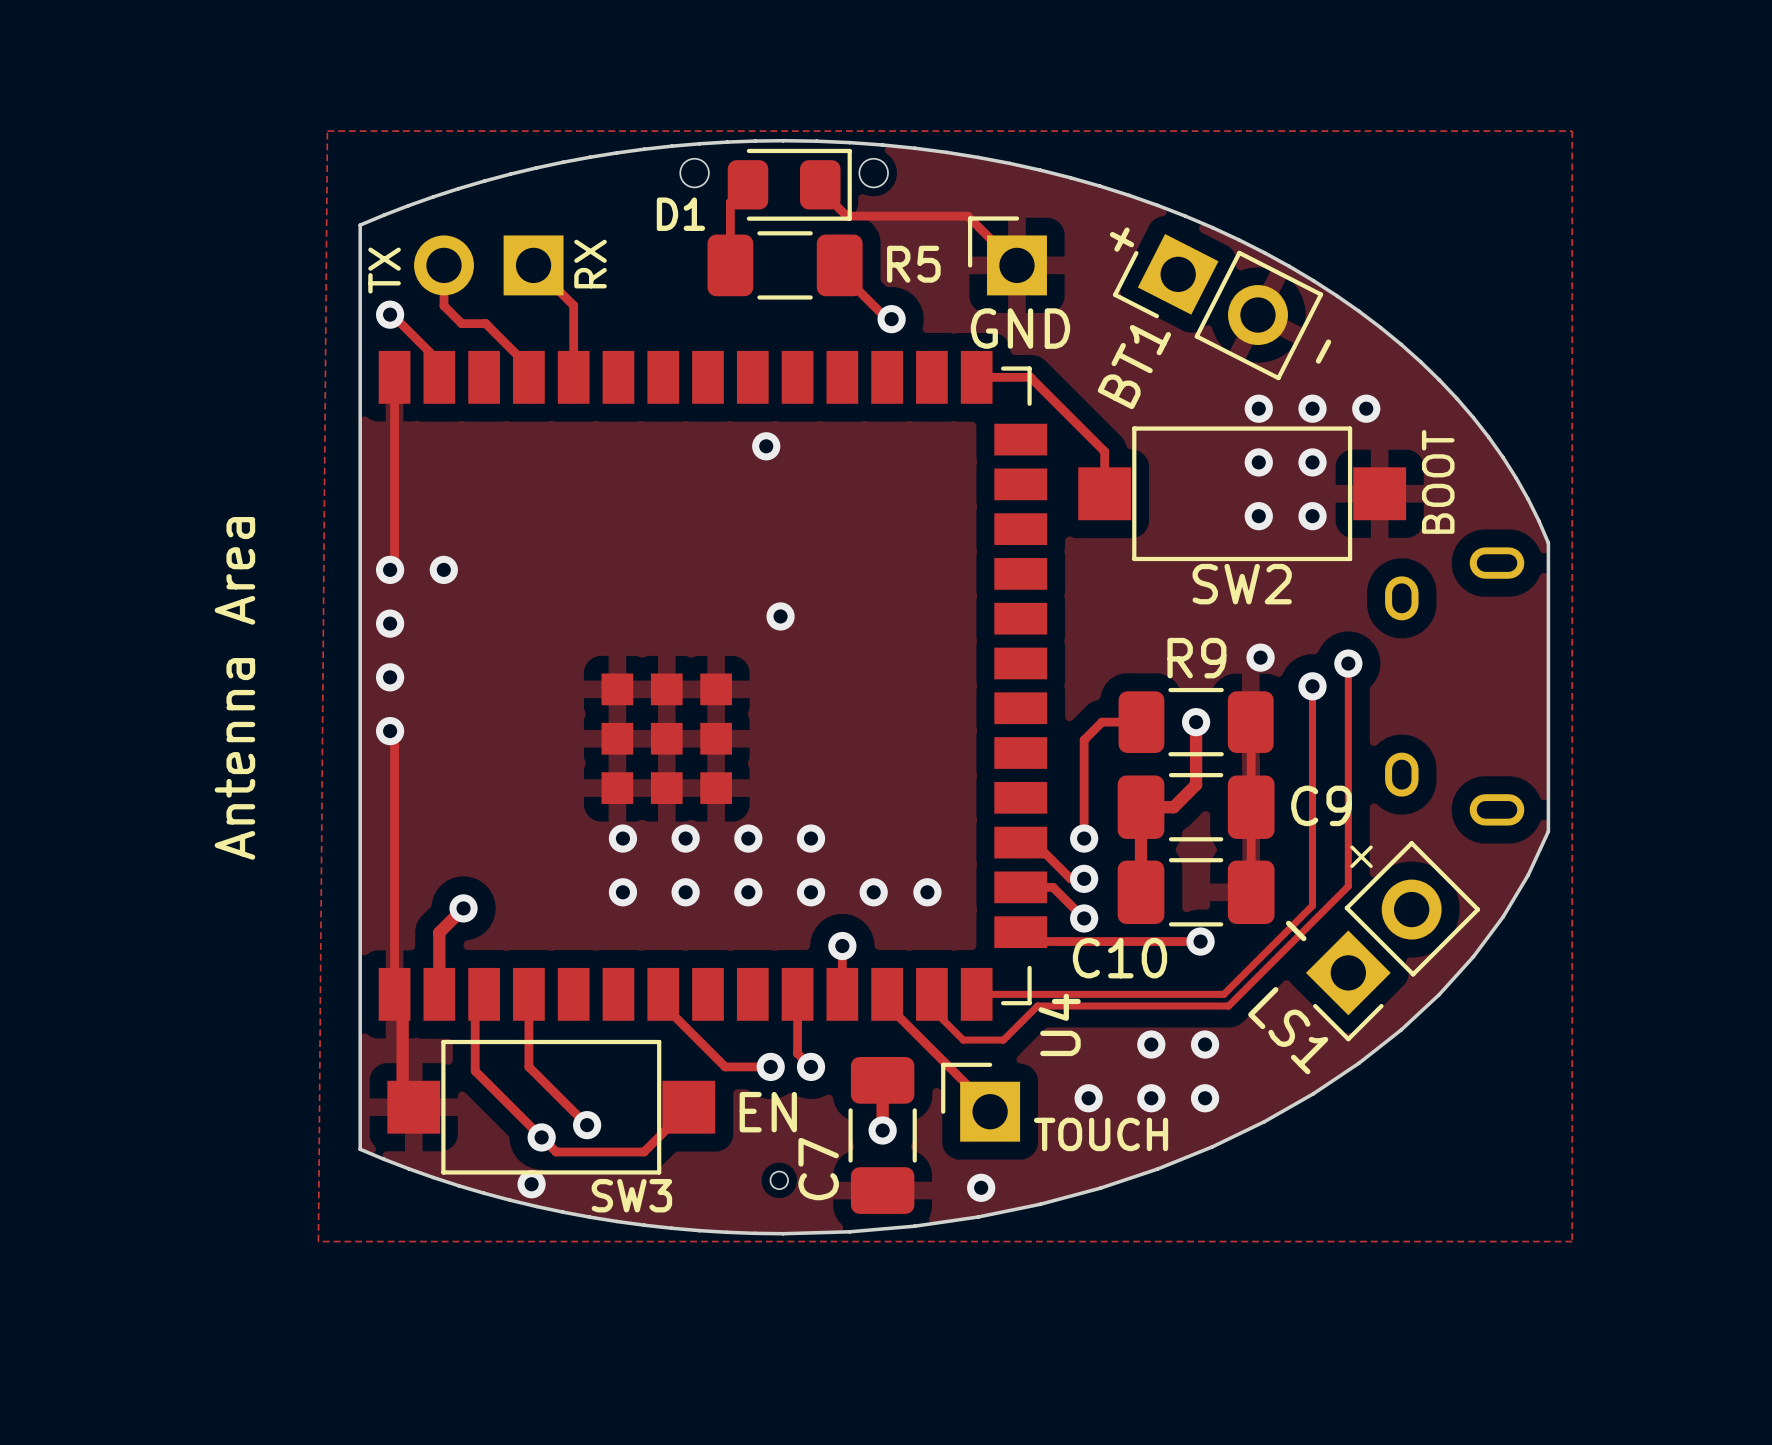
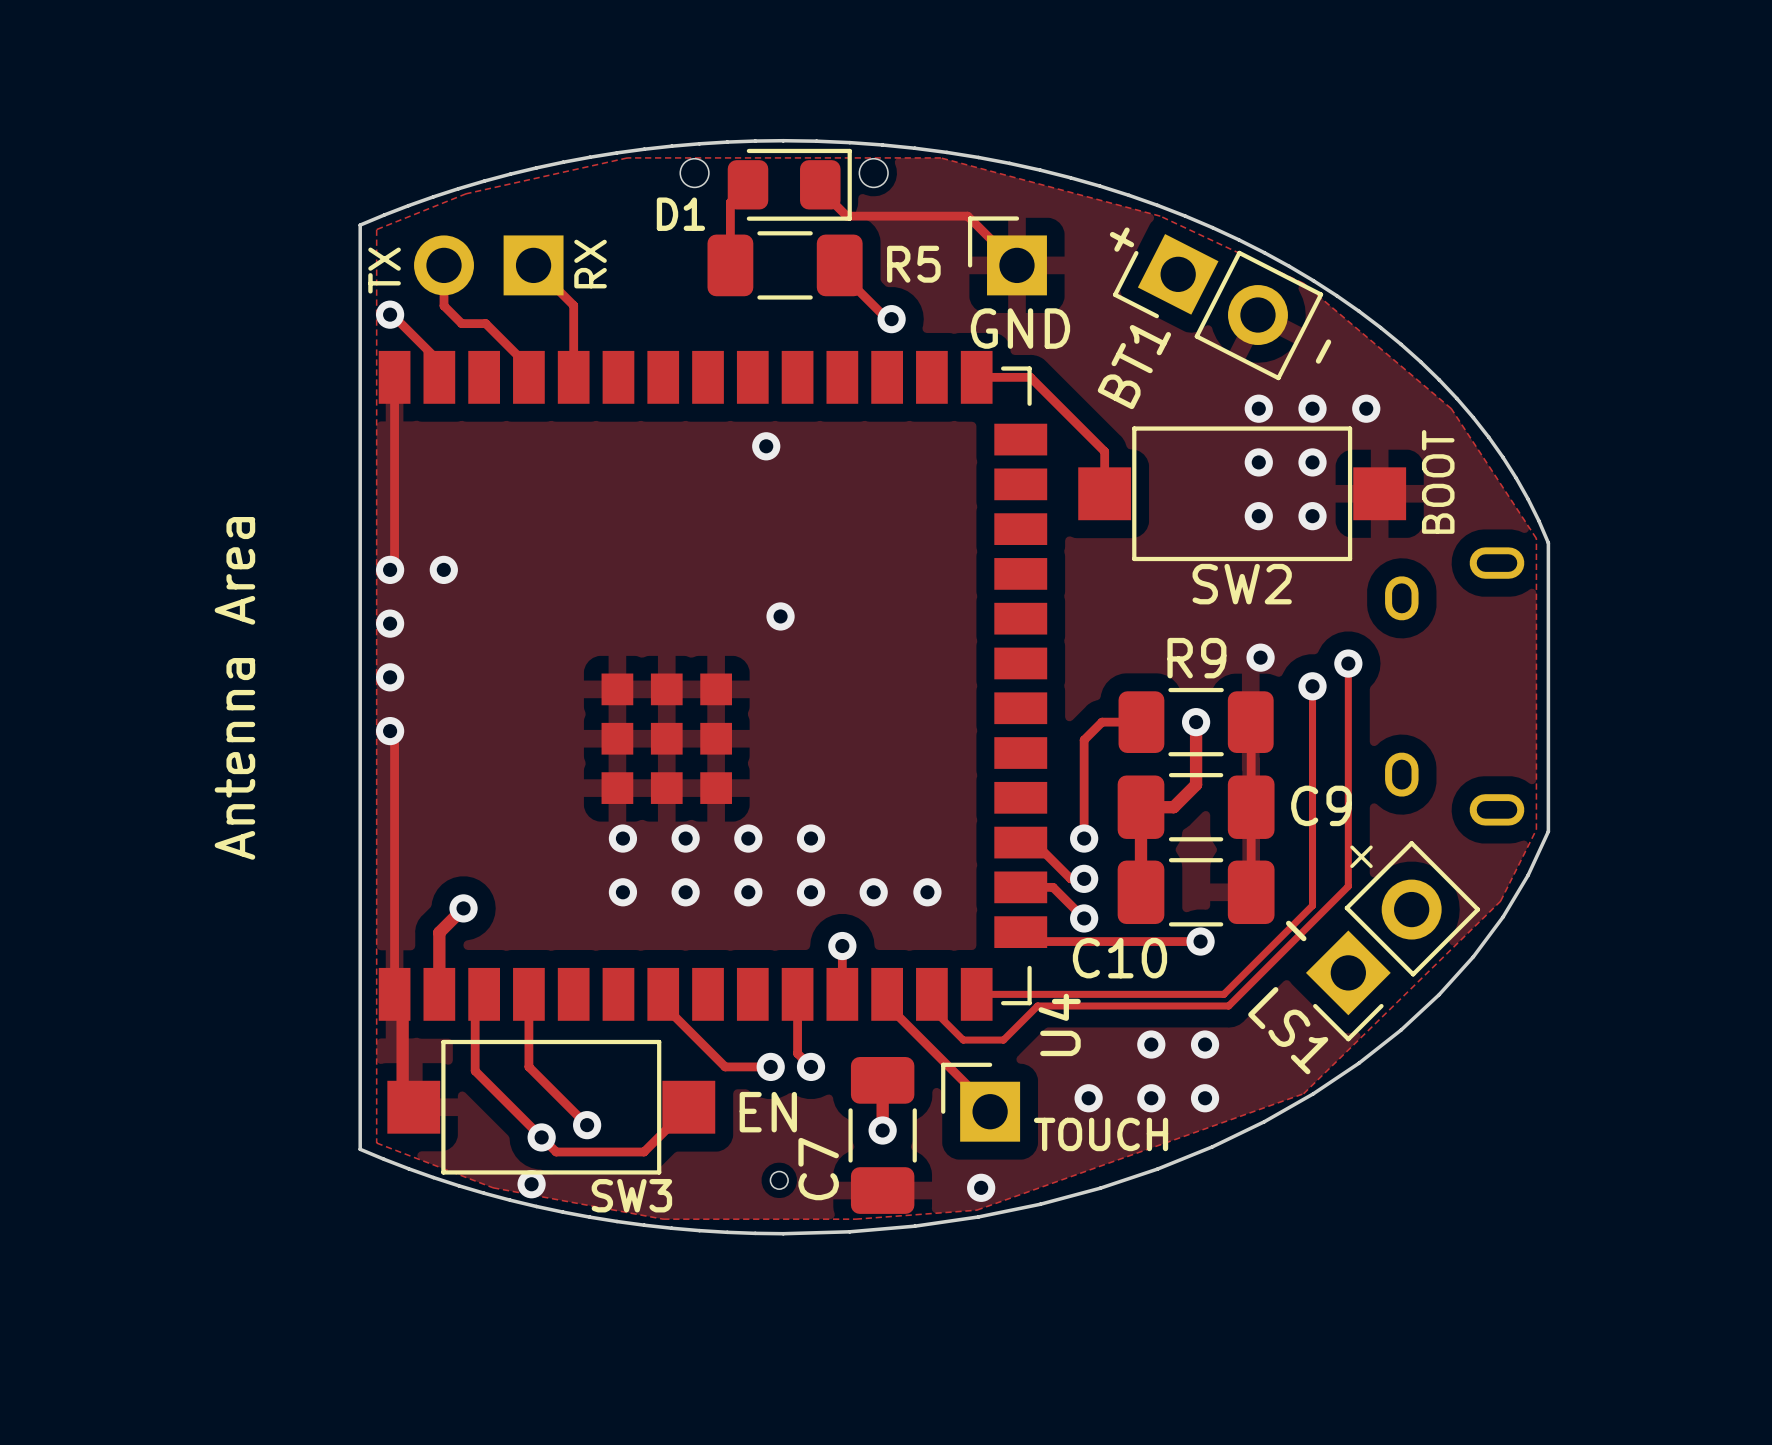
zone outline: (327, 131) (1572, 131) (1572, 1241) (318, 1241) (327, 131) -> (627, 157) (466, 193) (376, 229) (376, 1143) (493, 1187) (663, 1219) (855, 1219) (976, 1210) (1303, 1093) (1500, 901) (1536, 829) (1536, 538) (1451, 408) (1303, 283) (1160, 216) (940, 157) (627, 157)

